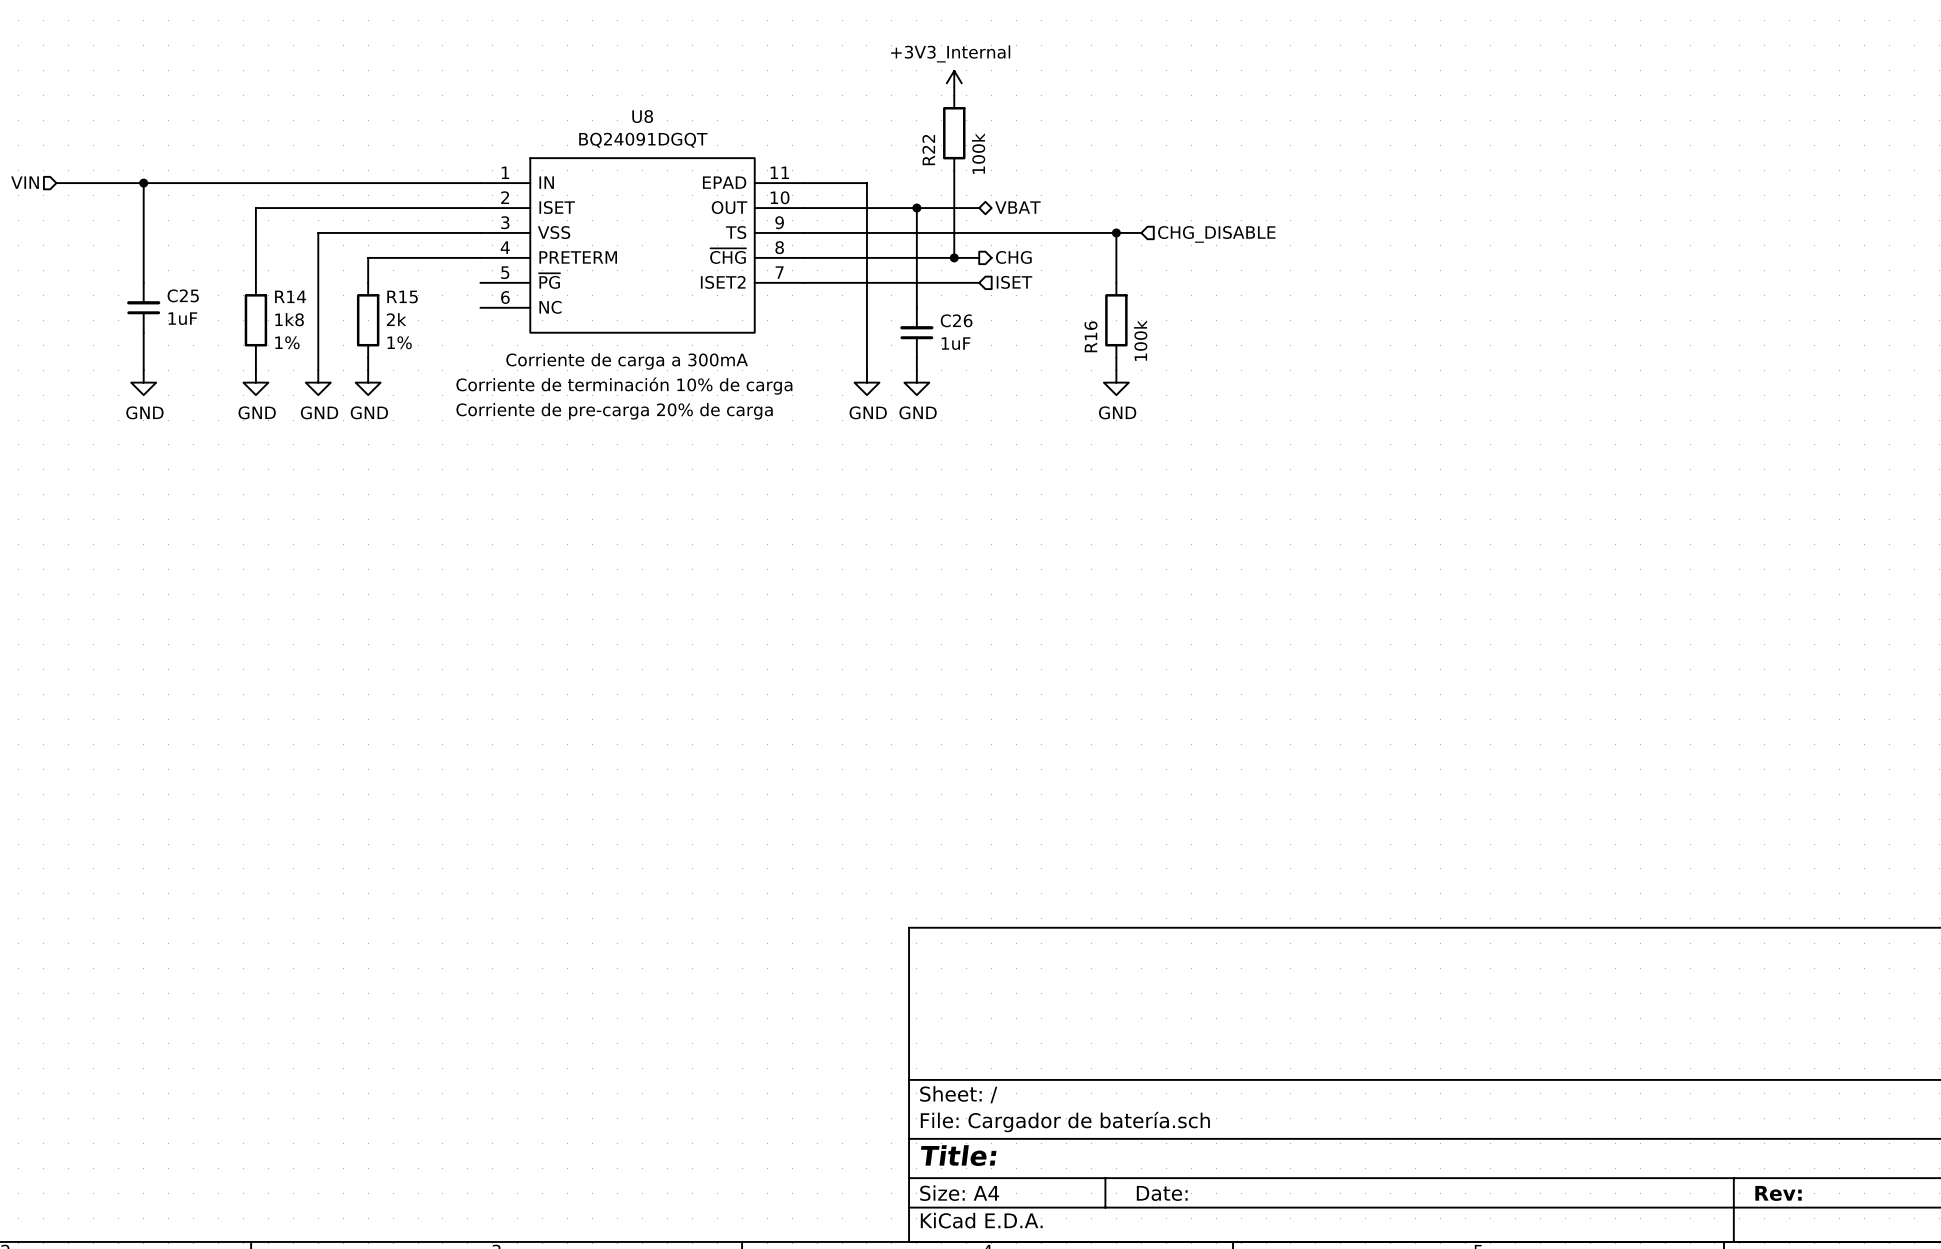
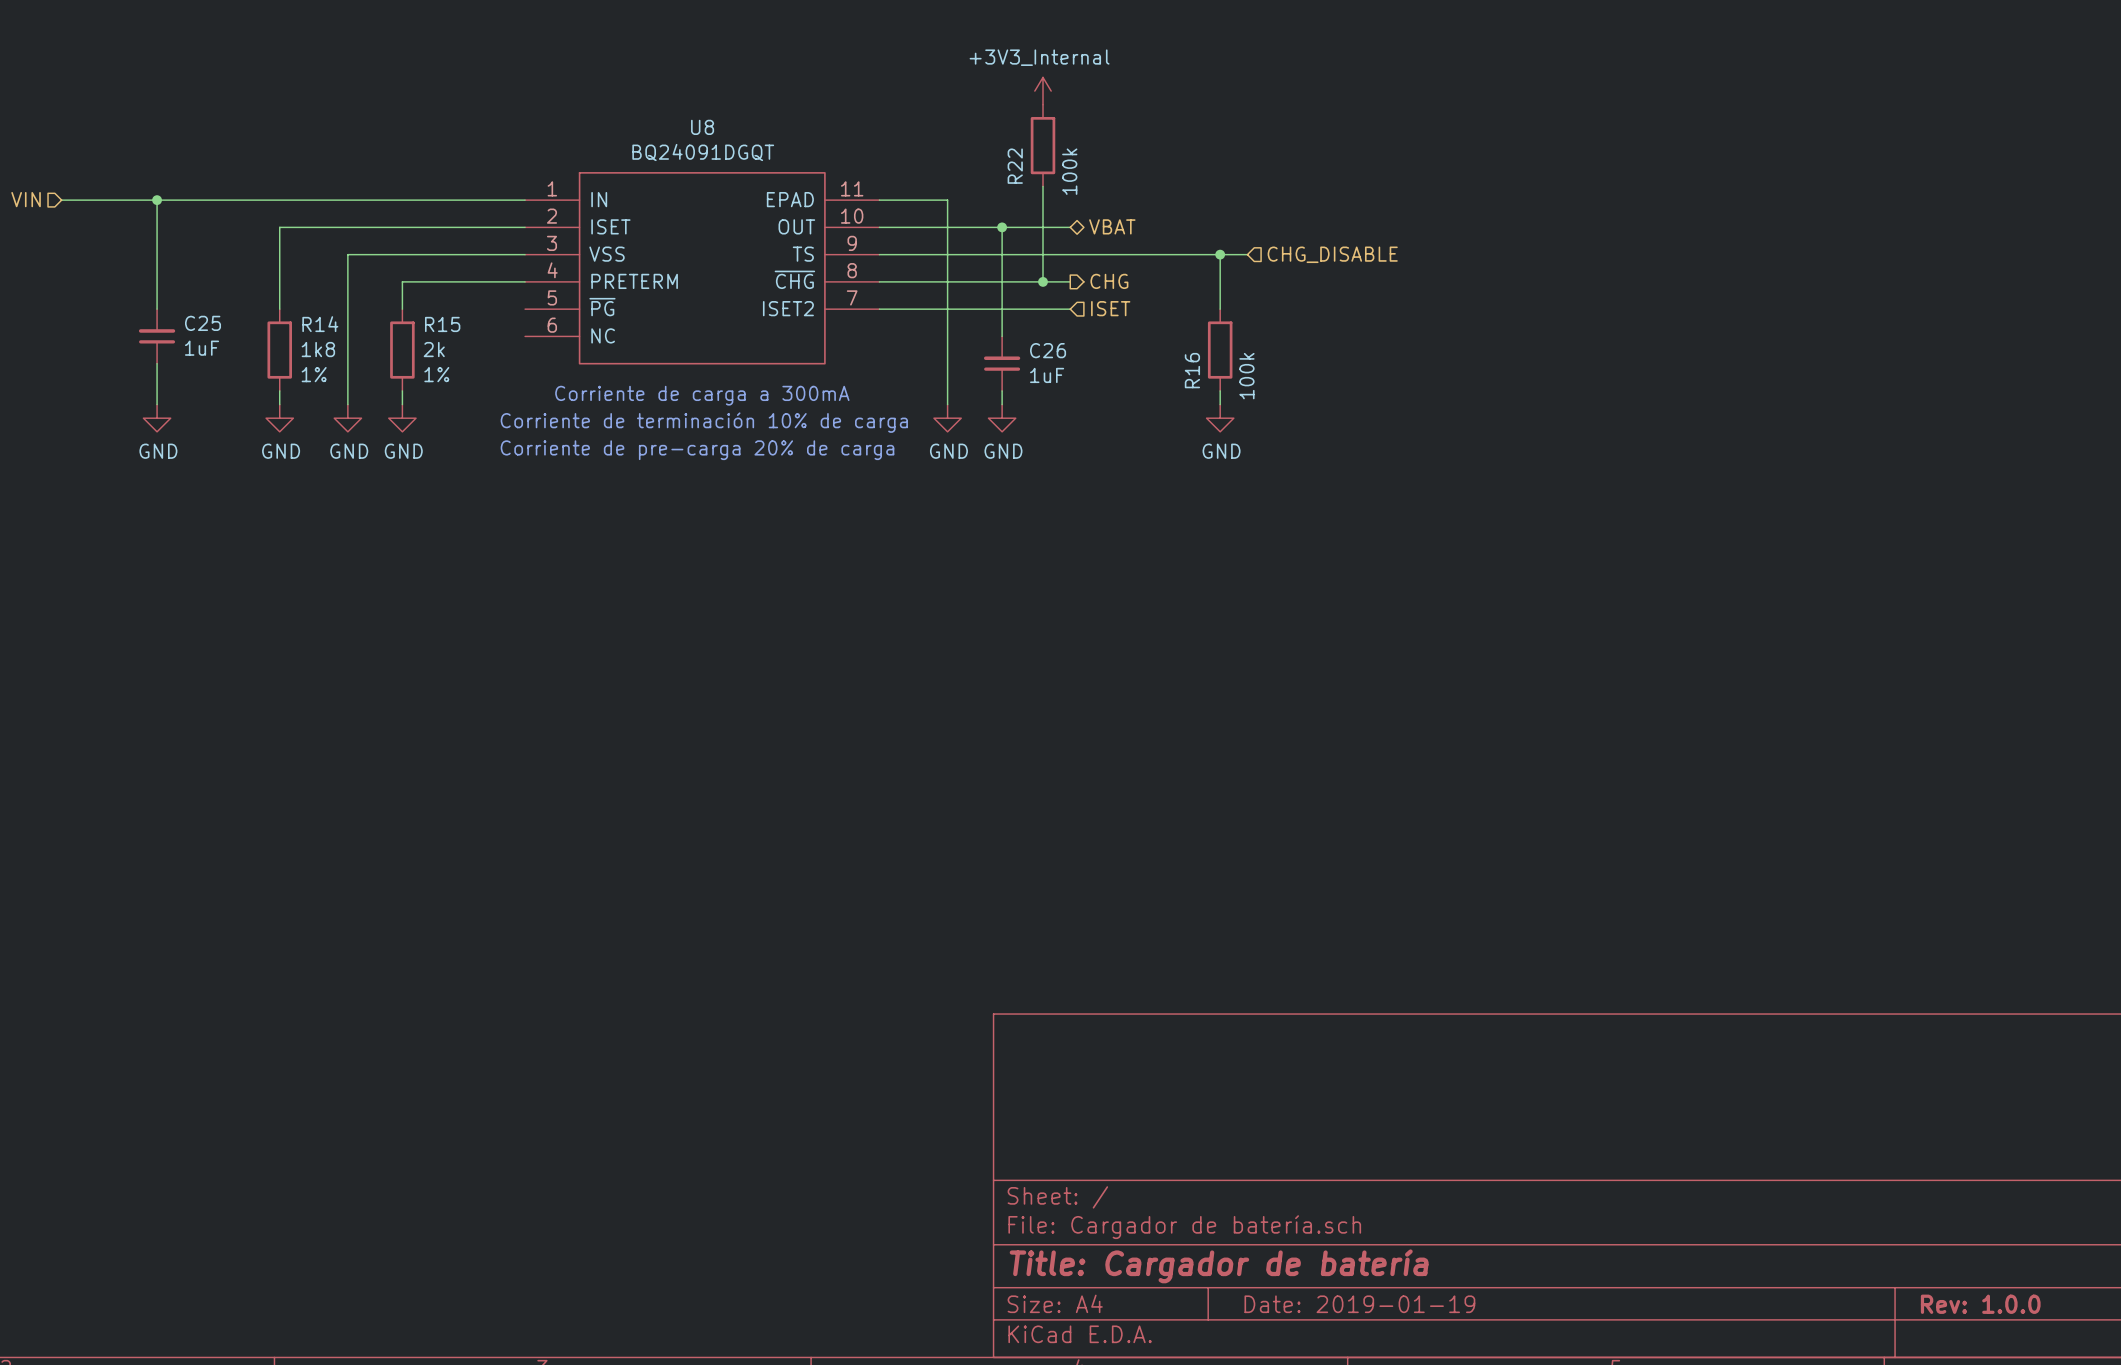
title block: Title: (958, 1155) -> Title: Cargador de batería (1219, 1266)
title block: Date: (1162, 1193) -> Date: 2019-01-19 (1359, 1304)
title block: Rev: (1778, 1193) -> Rev: 1.0.0 (1980, 1304)

